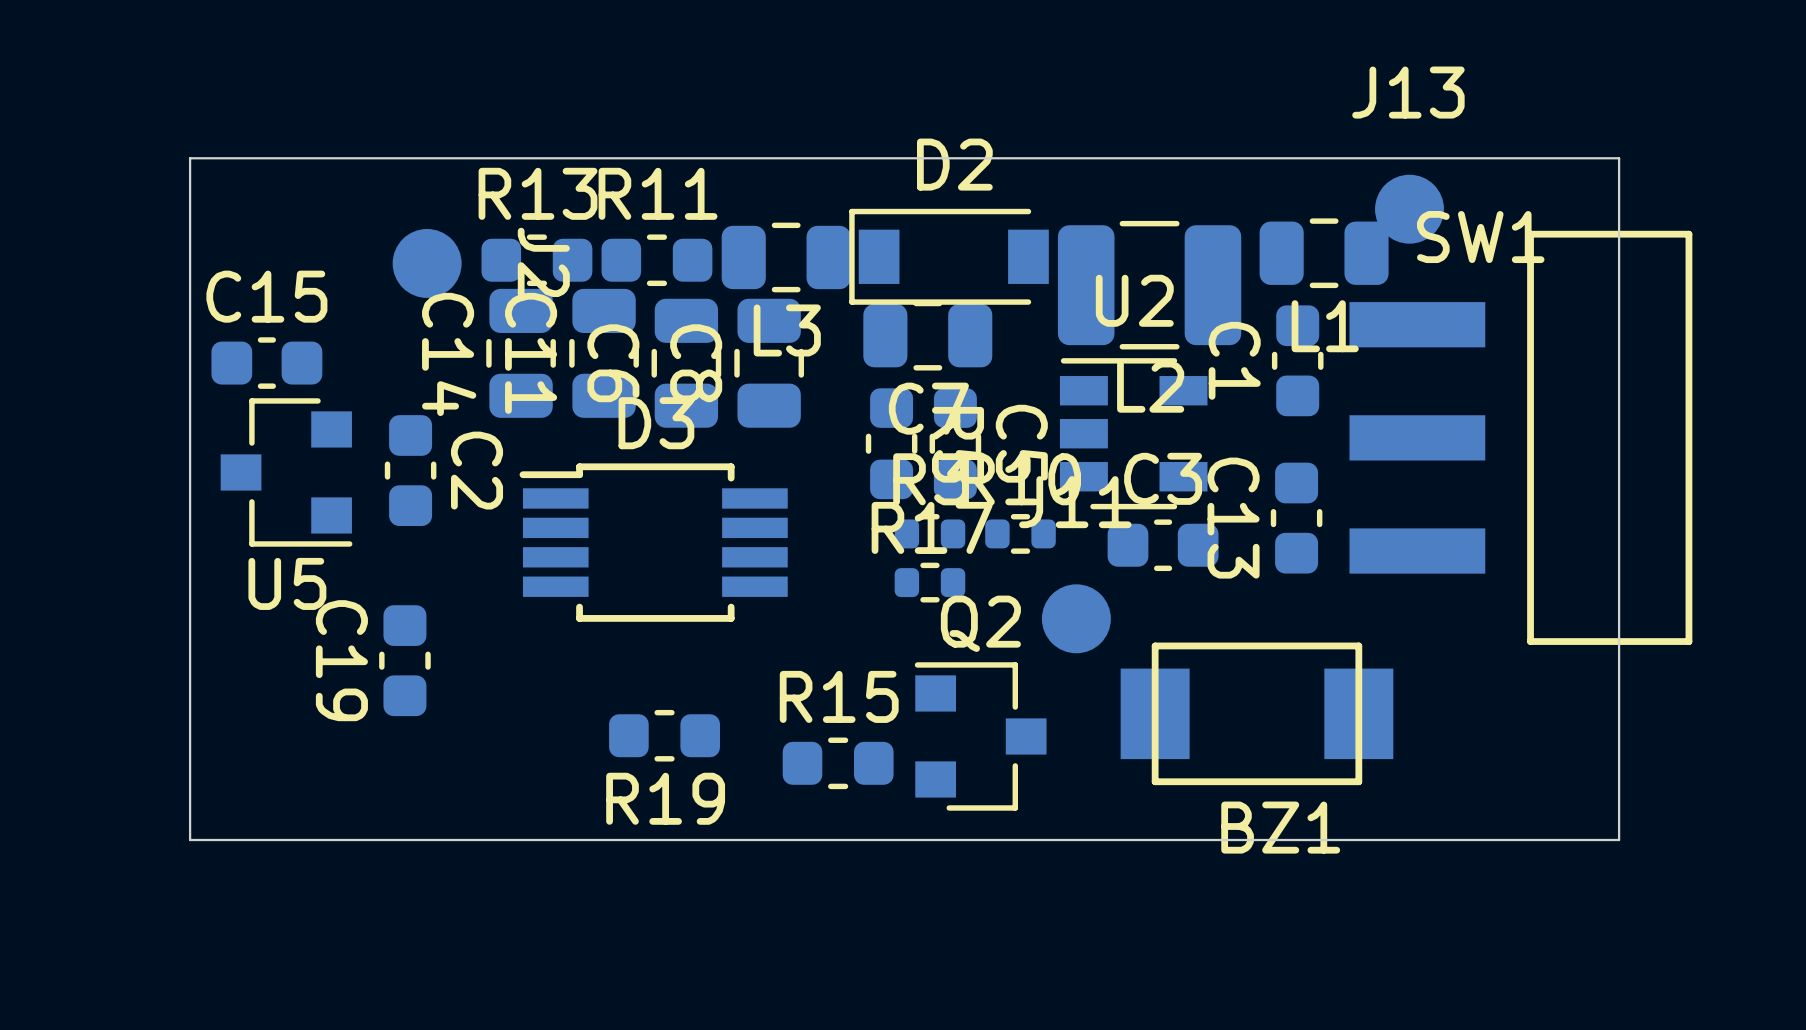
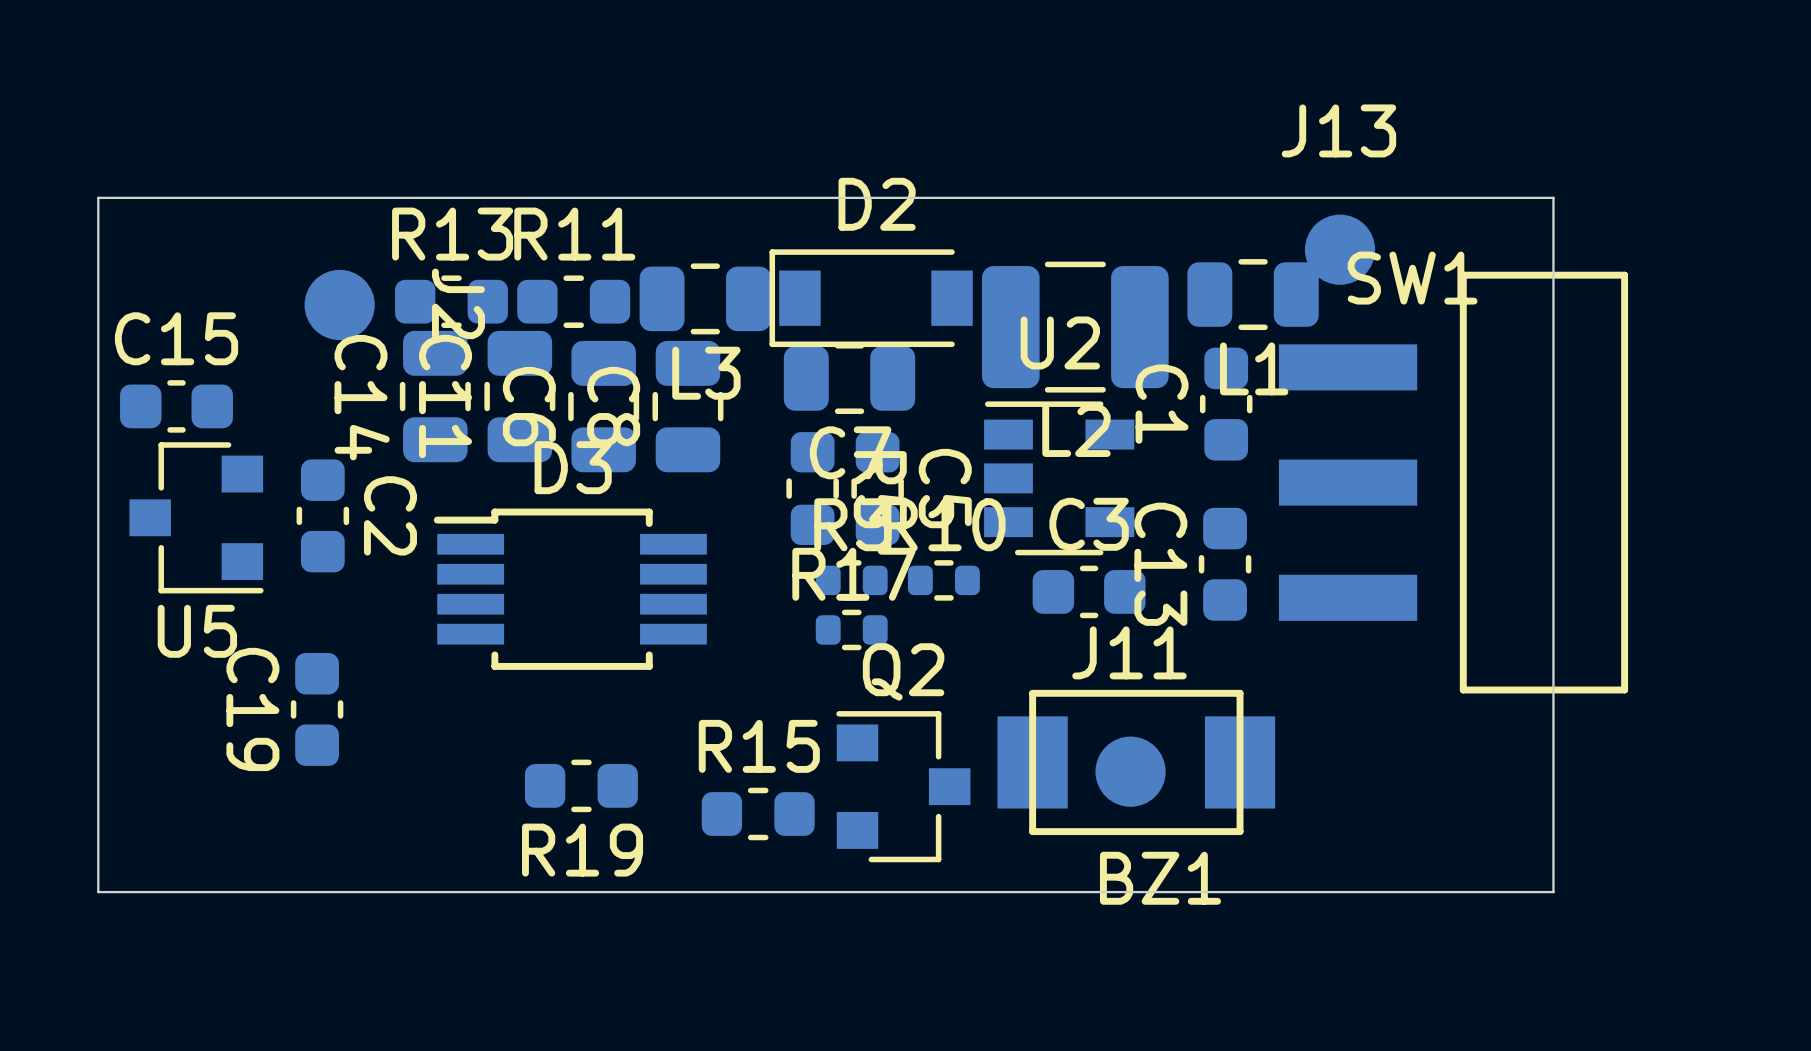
J11 position: (1076, 618) -> (1130, 771)
BZ1 position: (1256, 713) -> (1136, 762)

